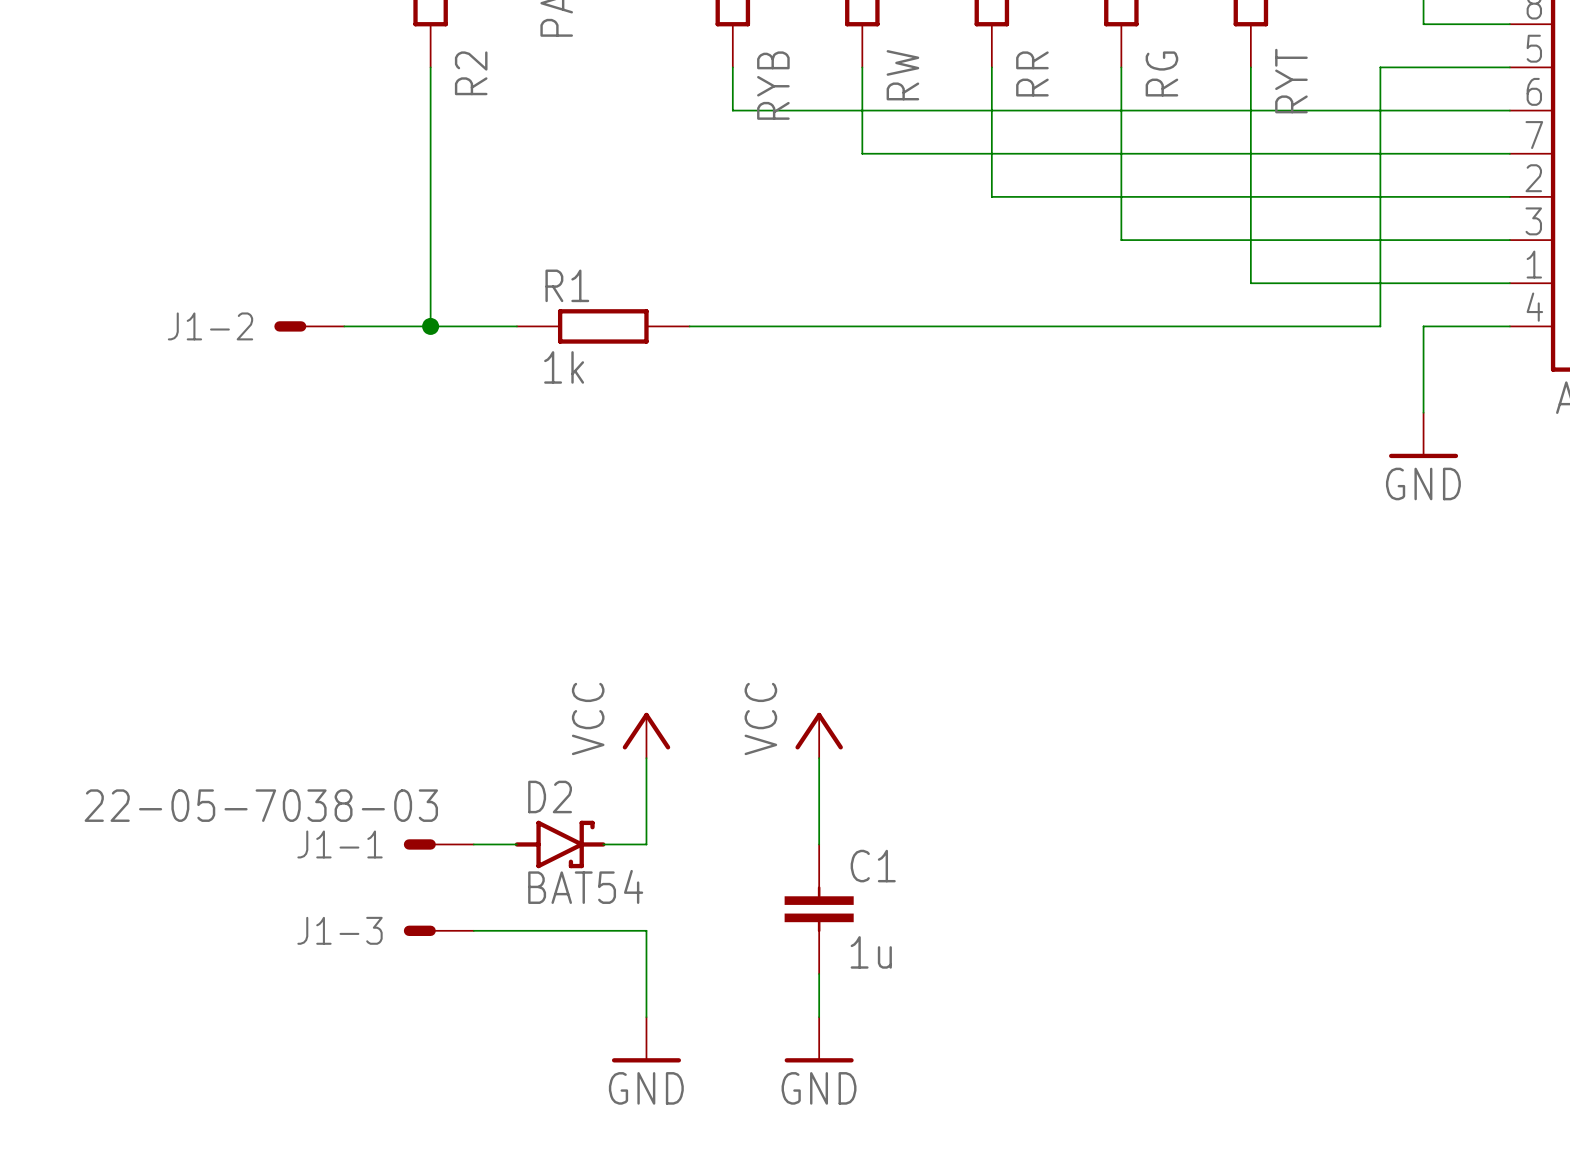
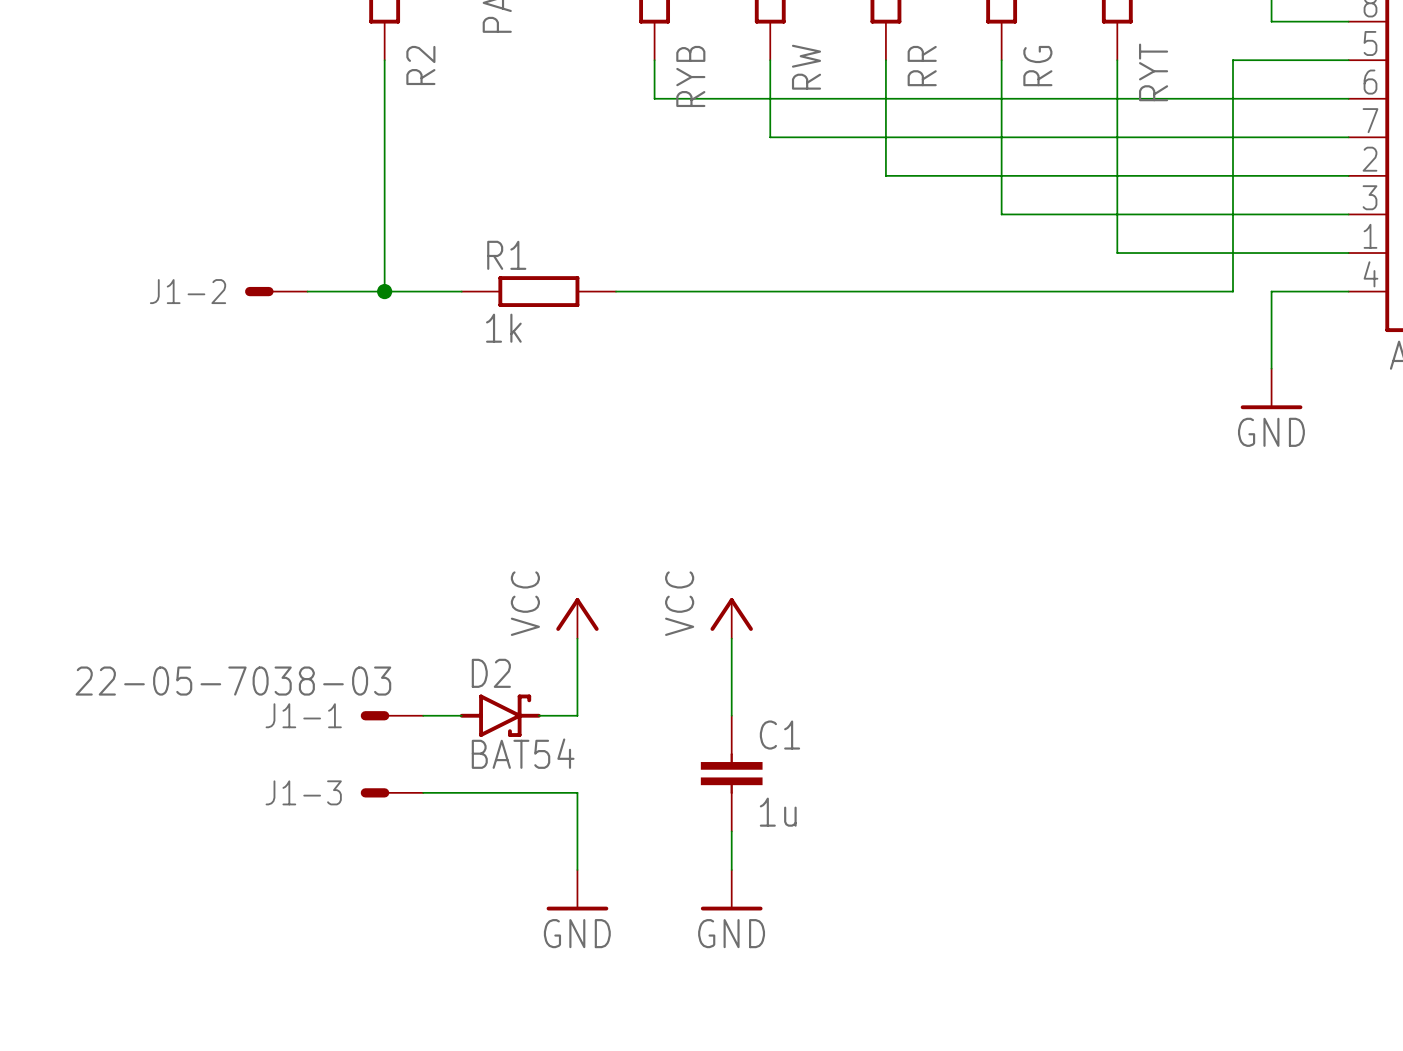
power symbol position: VCC (646, 735) -> VCC (577, 618)
power symbol position: VCC (819, 735) -> VCC (731, 618)
wire: (646, 801) (646, 844) (603, 844) -> (577, 715) (538, 715)
J1-1 position: (438, 844) -> (391, 715)
wire: (473, 844) (516, 844) -> (423, 715) (461, 715)
D2 position: (560, 844) -> (500, 715)
C1 position: (819, 909) -> (731, 773)
J1-3 position: (438, 930) -> (391, 792)
wire: (473, 930) (646, 930) -> (423, 792) (577, 792) (577, 831)
power symbol position: GND (646, 1039) -> GND (577, 890)
power symbol position: GND (819, 1039) -> GND (731, 890)

